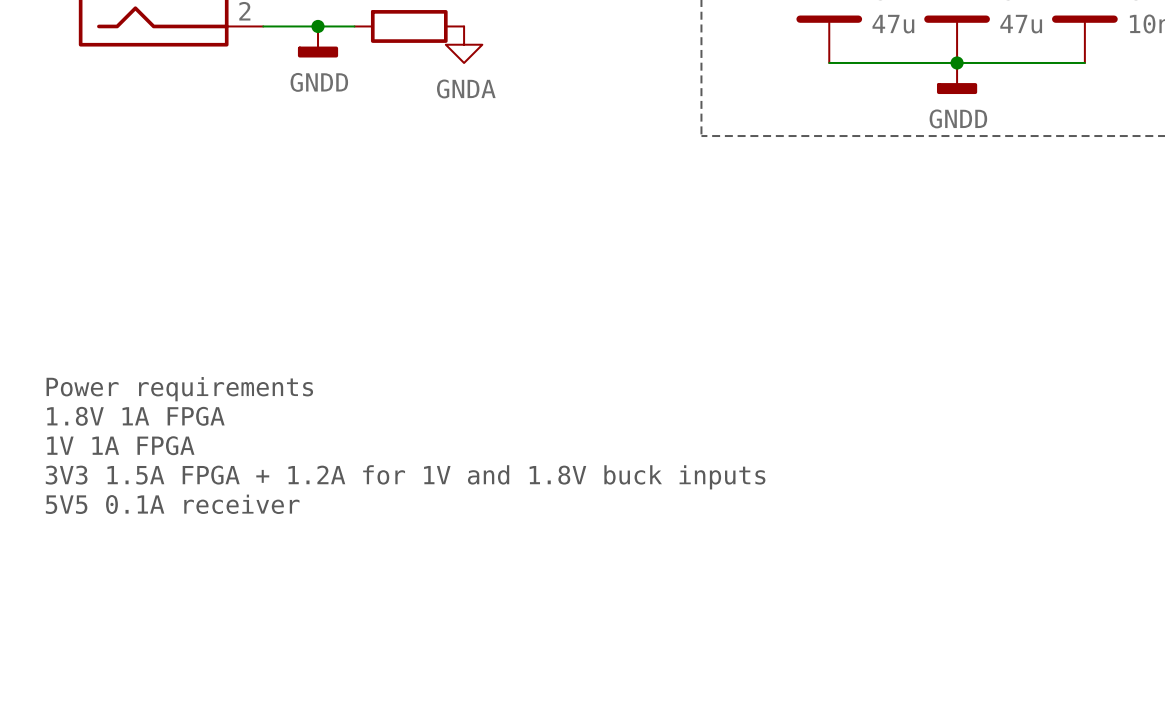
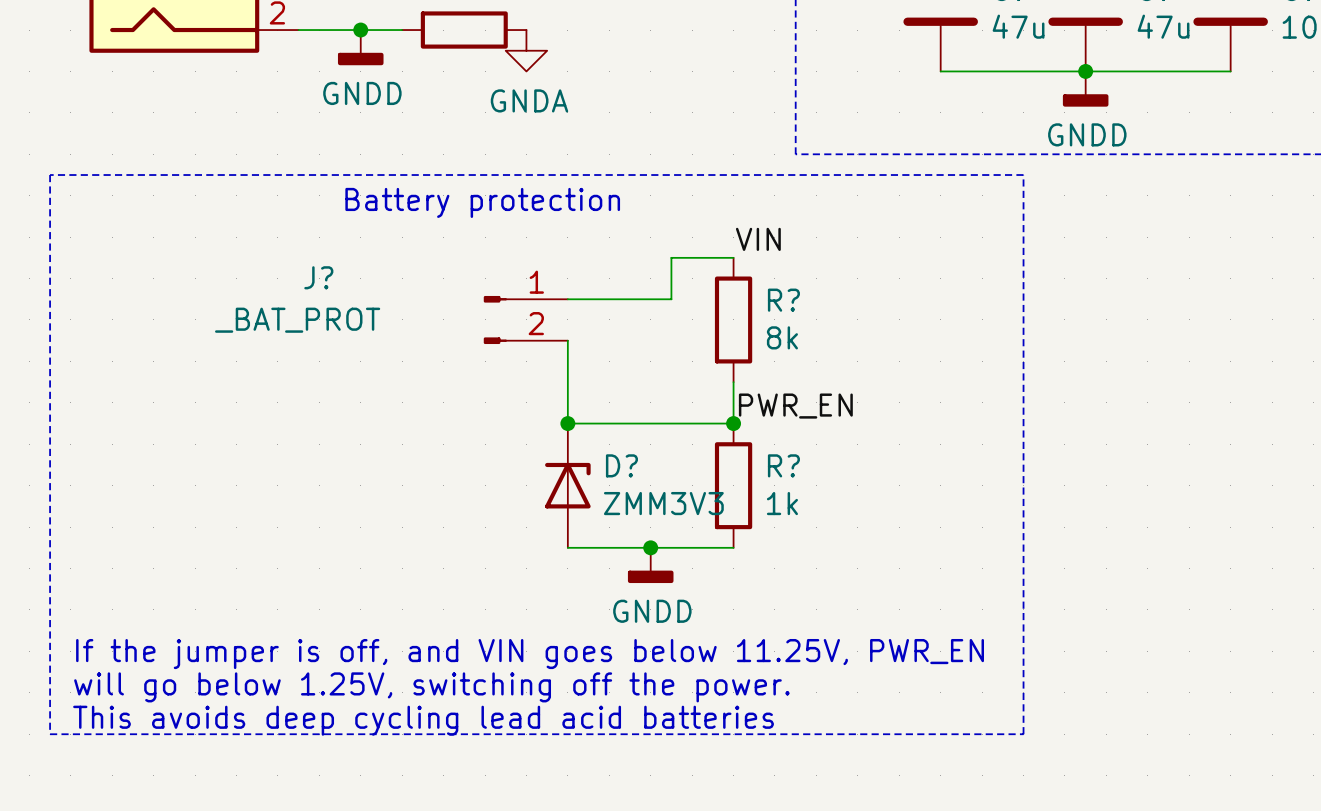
line: none -> (50, 175) (1023, 175) (1023, 734) (50, 734) (50, 175)
text: none -> Battery protection (482, 202)
label: none -> VIN (758, 239)
wire: none -> (733, 257) (671, 257) (671, 299) (567, 299)
J?: none -> _BAT_PROT (525, 319)
R?: none -> 8k (733, 319)
wire: none -> (567, 340) (567, 423) (733, 423) (733, 382)
label: none -> PWR_EN (795, 406)
junction: none -> (567, 423)
junction: none -> (733, 423)
text: Power requirements (179, 389) -> none
text: 1.8V 1A FPGA (135, 416) -> none
D?: none -> ZMM3V3 (567, 485)
R?: none -> 1k (733, 485)
text: 1V 1A FPGA (120, 445) -> none
text: 3V3 1.5A FPGA + 1.2A for 1V and 1.8V buck inputs (405, 477) -> none
wire: none -> (567, 547) (733, 547)
junction: none -> (650, 547)
power symbol: none -> GNDD (650, 565)
text: 5V5 0.1A receiver (172, 504) -> none
text: none -> If the jumper is off, and VIN goes below 11.25V, PWR_EN (530, 654)
text: none -> will go below 1.25V, switching off the power. (431, 687)
text: none -> This avoids deep cycling lead acid batteries (423, 720)

